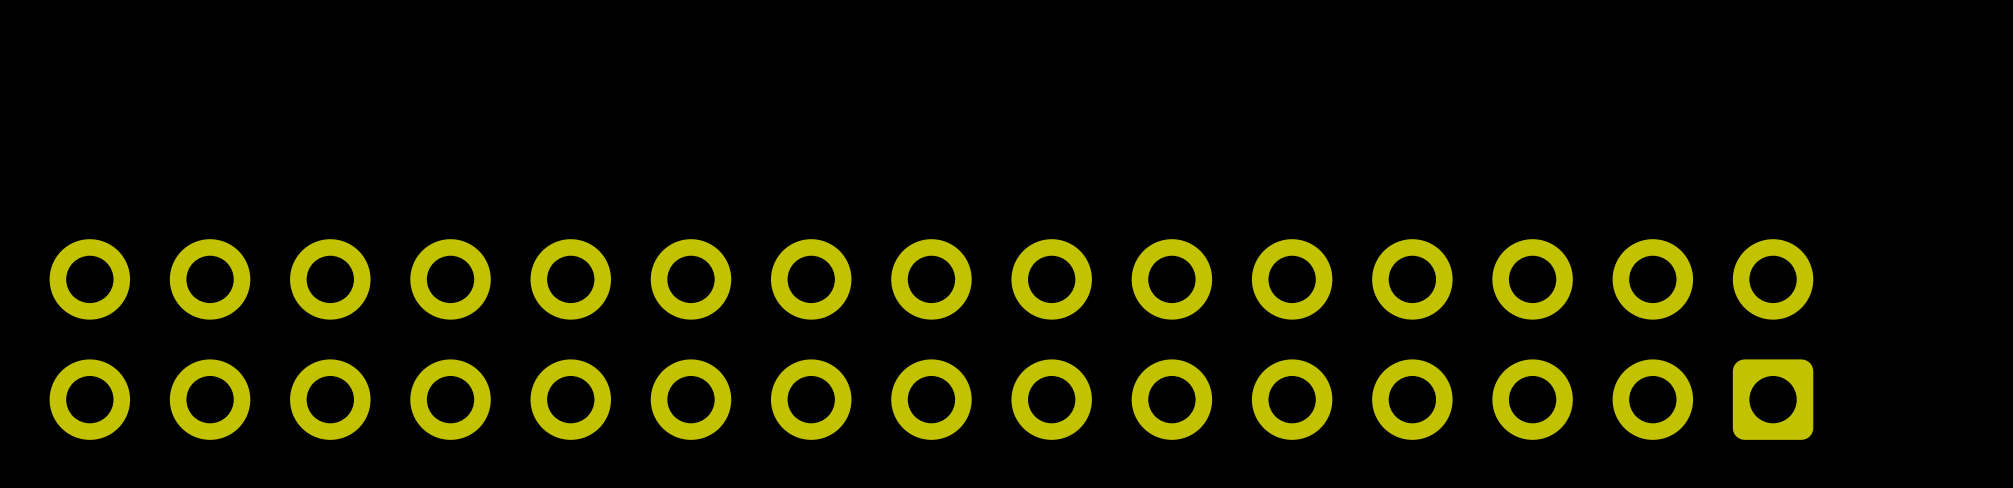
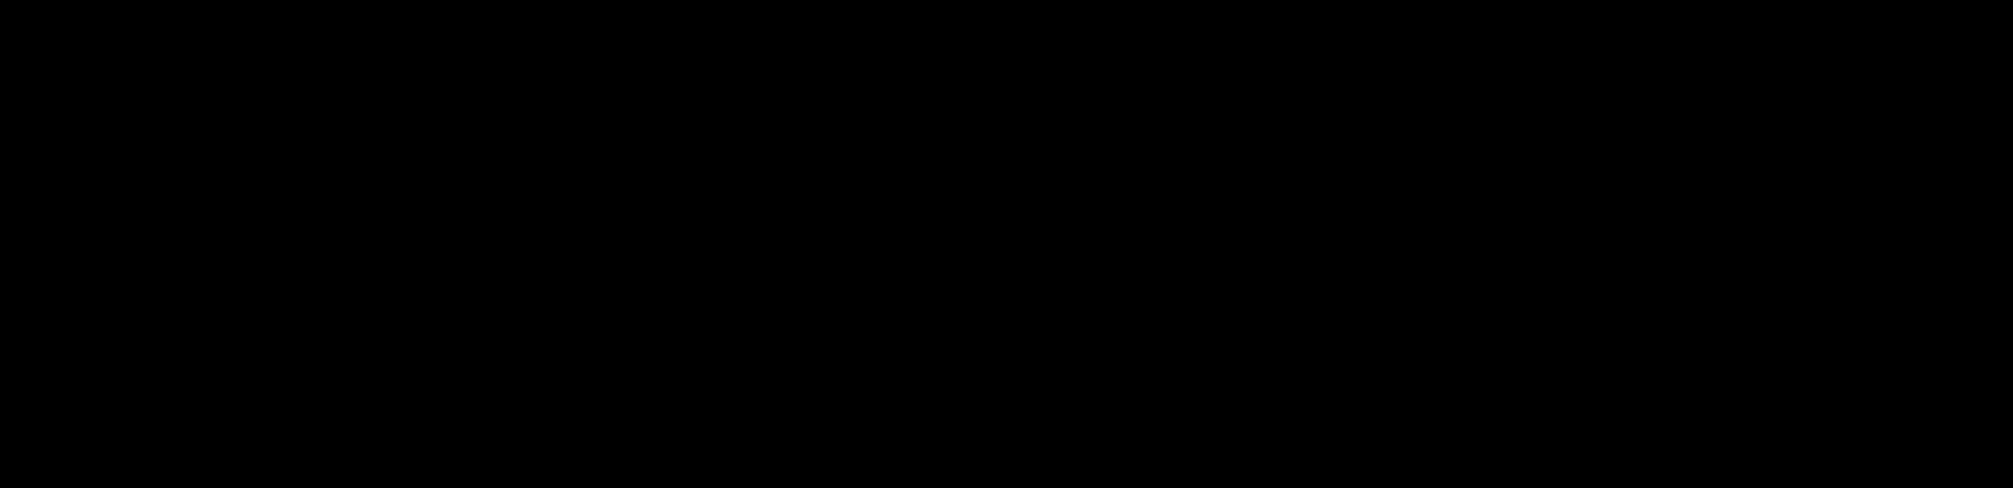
part: (931, 339) -> none

